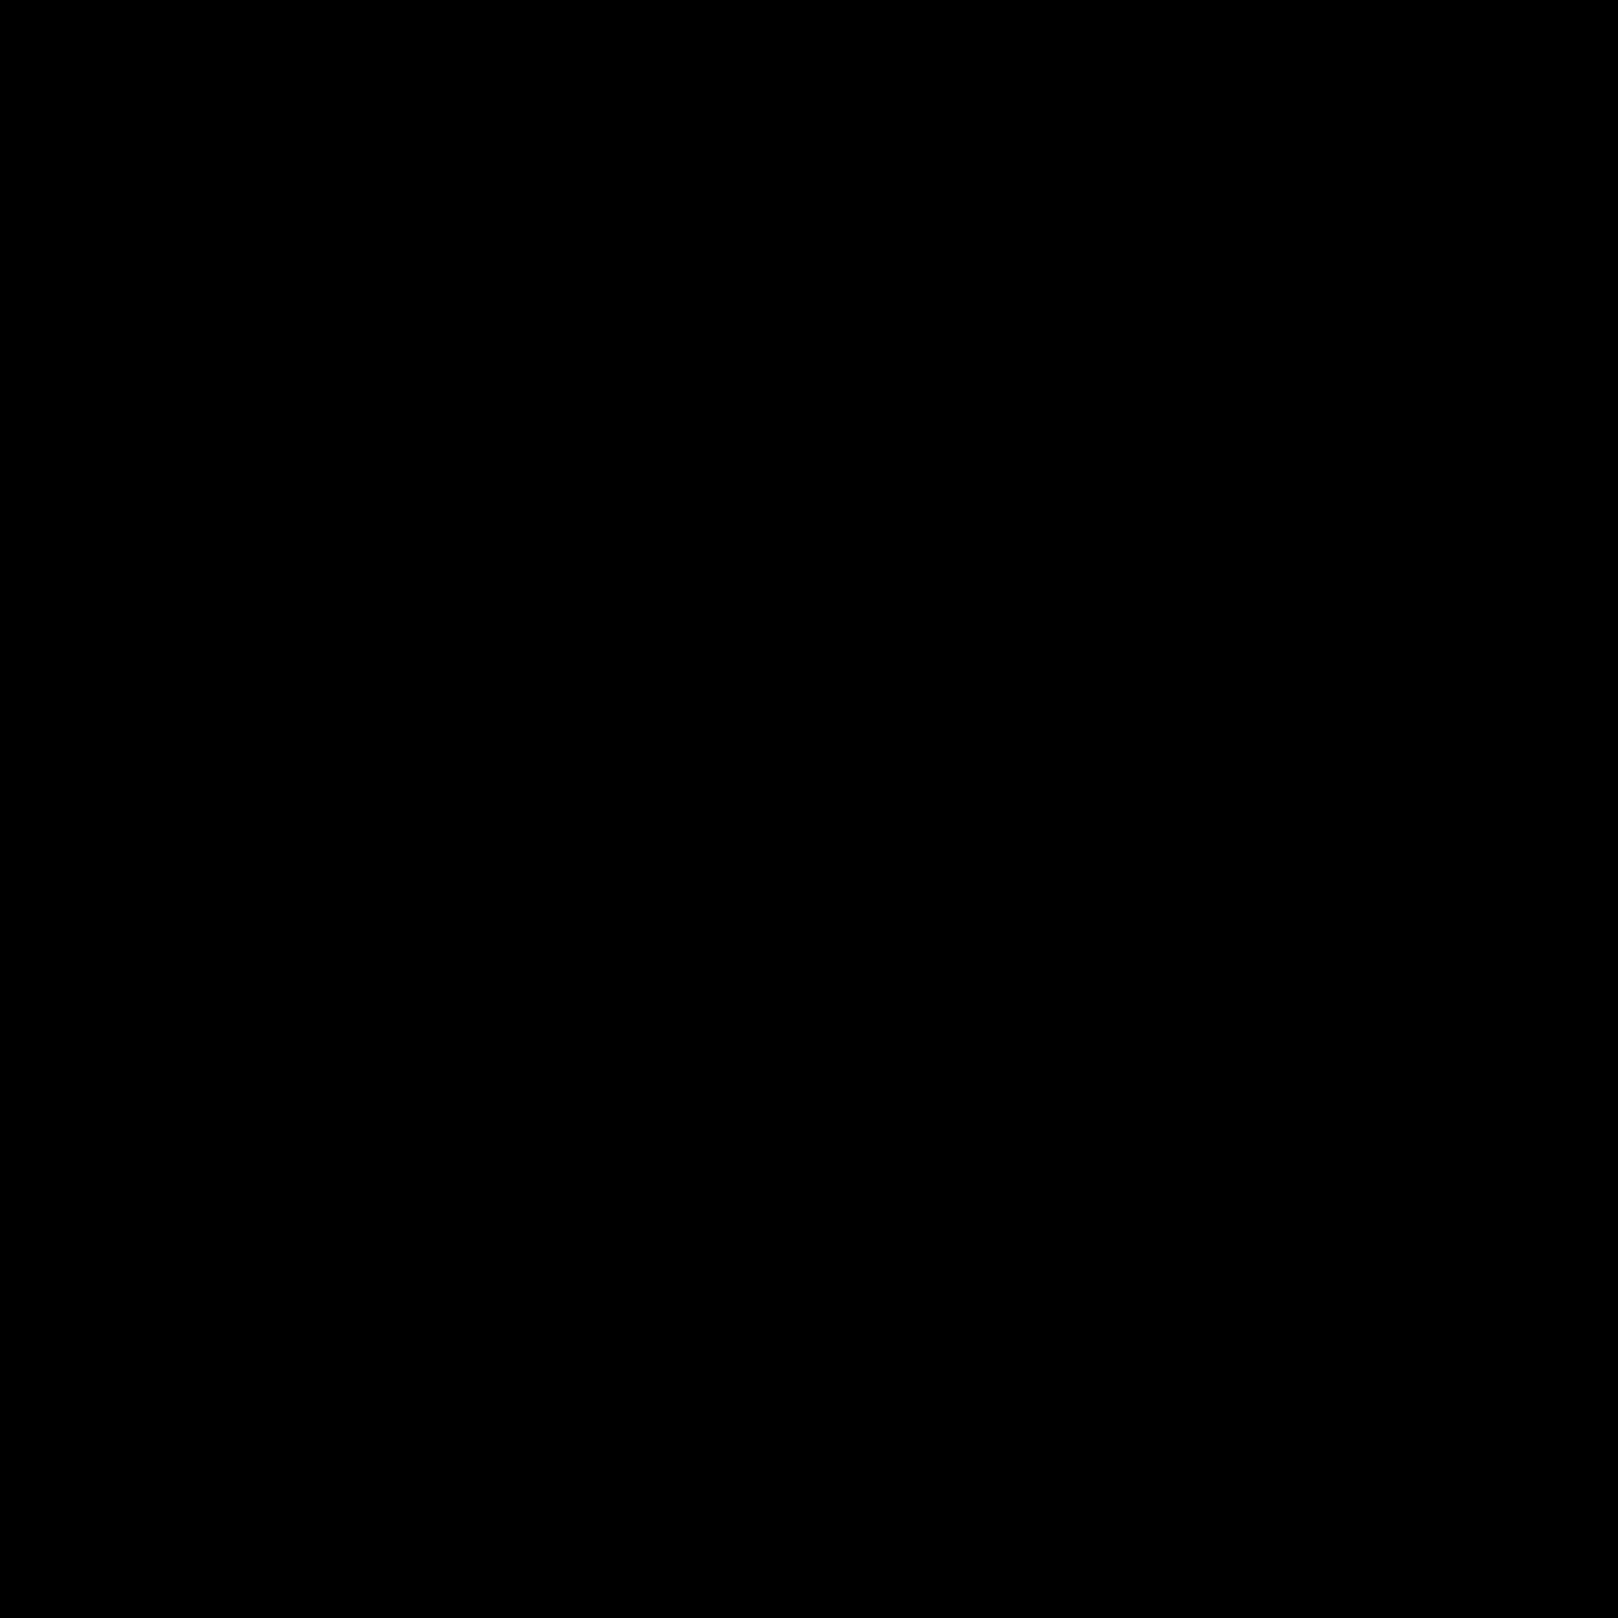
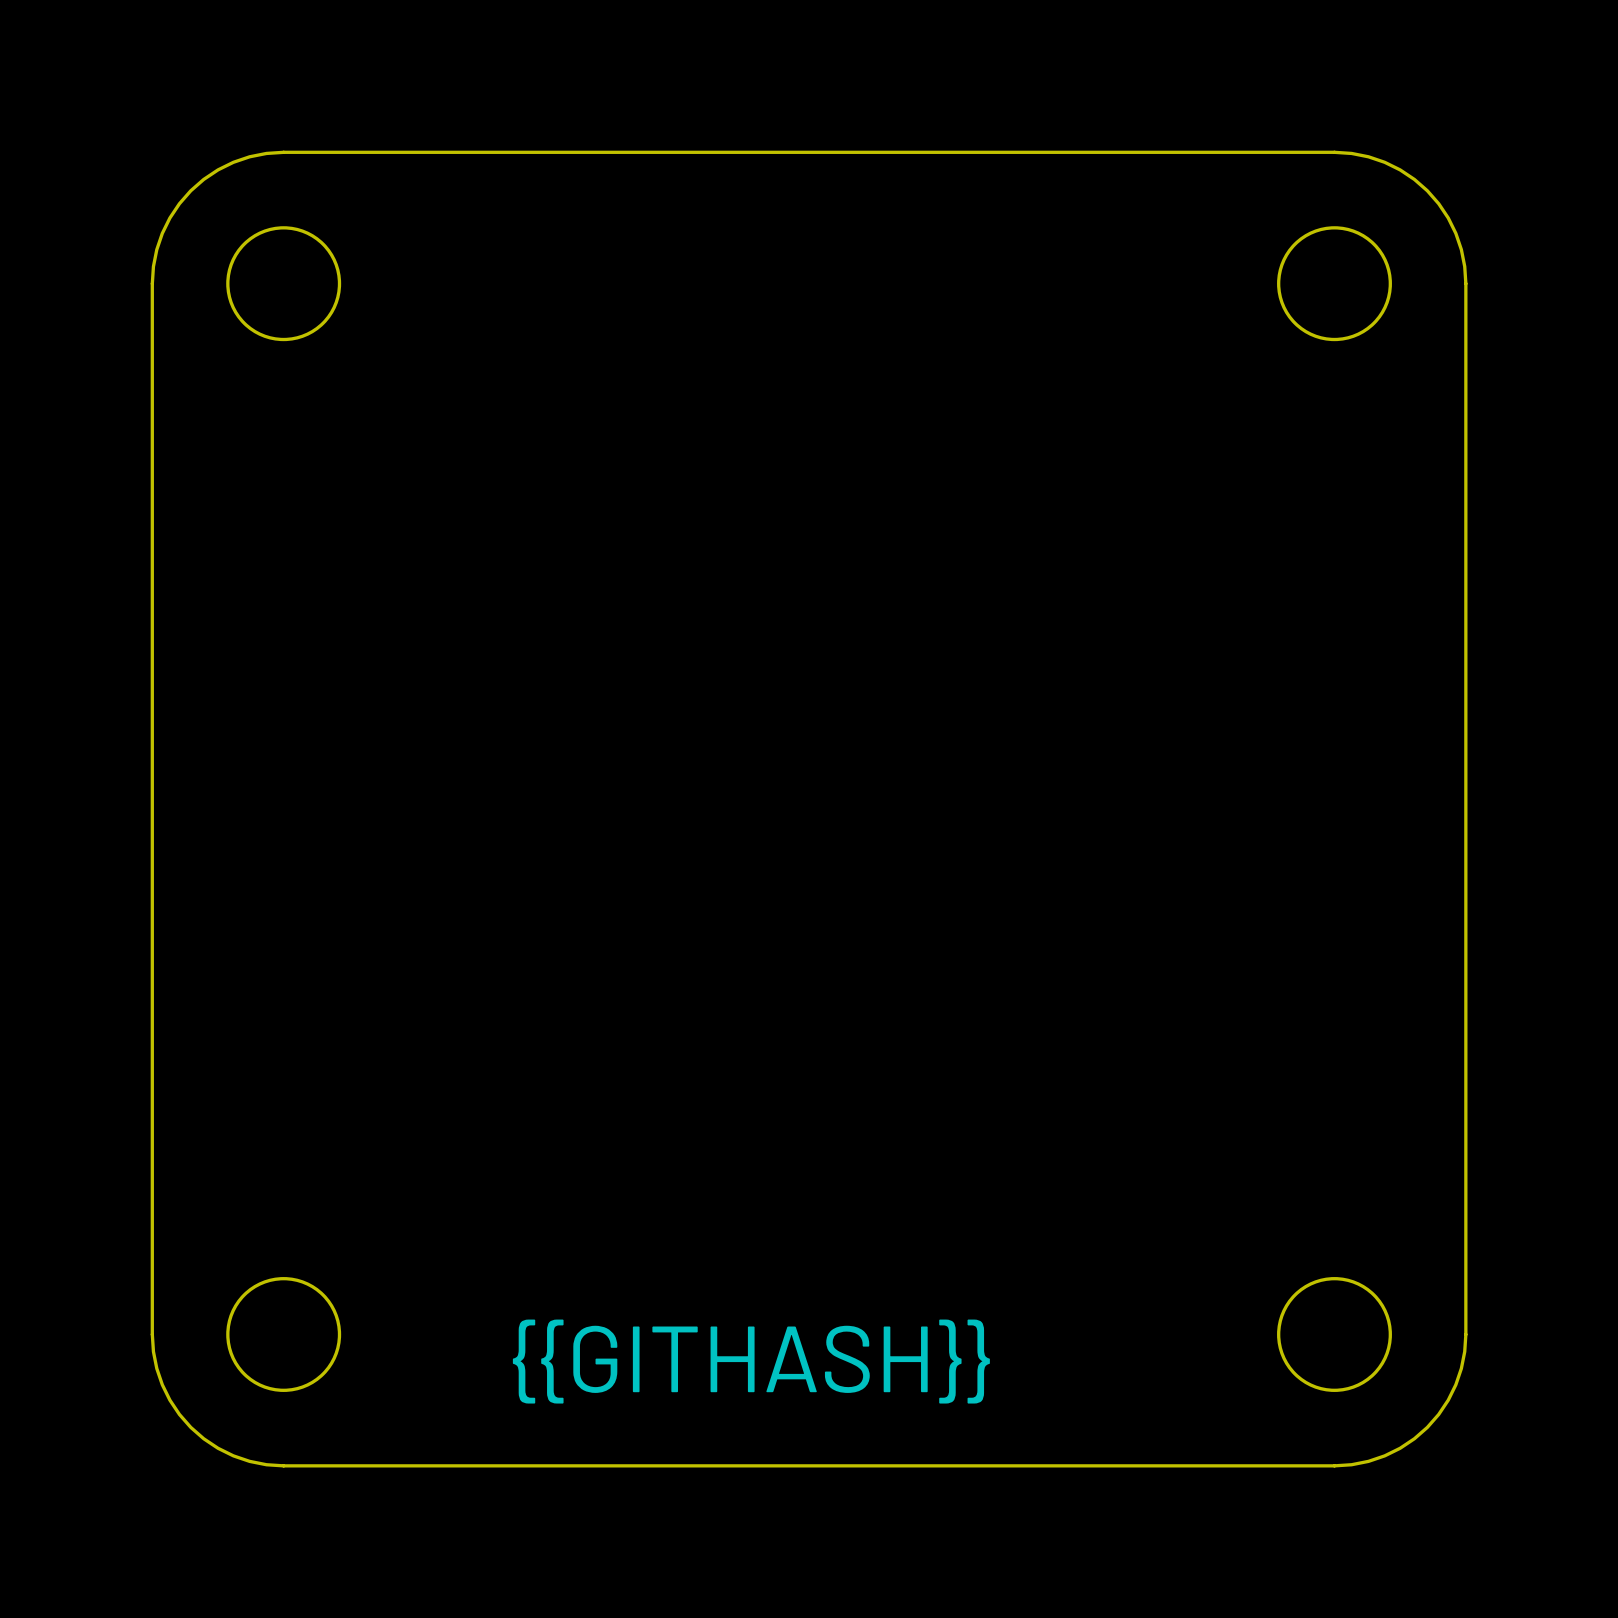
board edge: none -> (283, 152) (1334, 152) (1368, 156) (1384, 162) (1414, 179) (1427, 190) (1438, 203) (1455, 233) (1461, 249) (1465, 283) (1465, 1334) (1464, 1351) (1455, 1384) (1438, 1414) (1427, 1427) (1414, 1438) (1384, 1455) (1368, 1461) (1334, 1465) (283, 1465) (266, 1464) (233, 1455) (203, 1438) (190, 1427) (169, 1400) (162, 1384) (153, 1351) (152, 1334) (153, 266) (162, 233) (169, 217) (190, 190) (203, 179) (233, 162) (249, 156) (283, 152)
round board edge: none -> [226, 226, 342, 342]
round board edge: none -> [1277, 226, 1392, 342]
round board edge: none -> [226, 1277, 342, 1392]
round board edge: none -> [1277, 1277, 1392, 1392]
text: none -> {{GITHASH}} (751, 1361)

